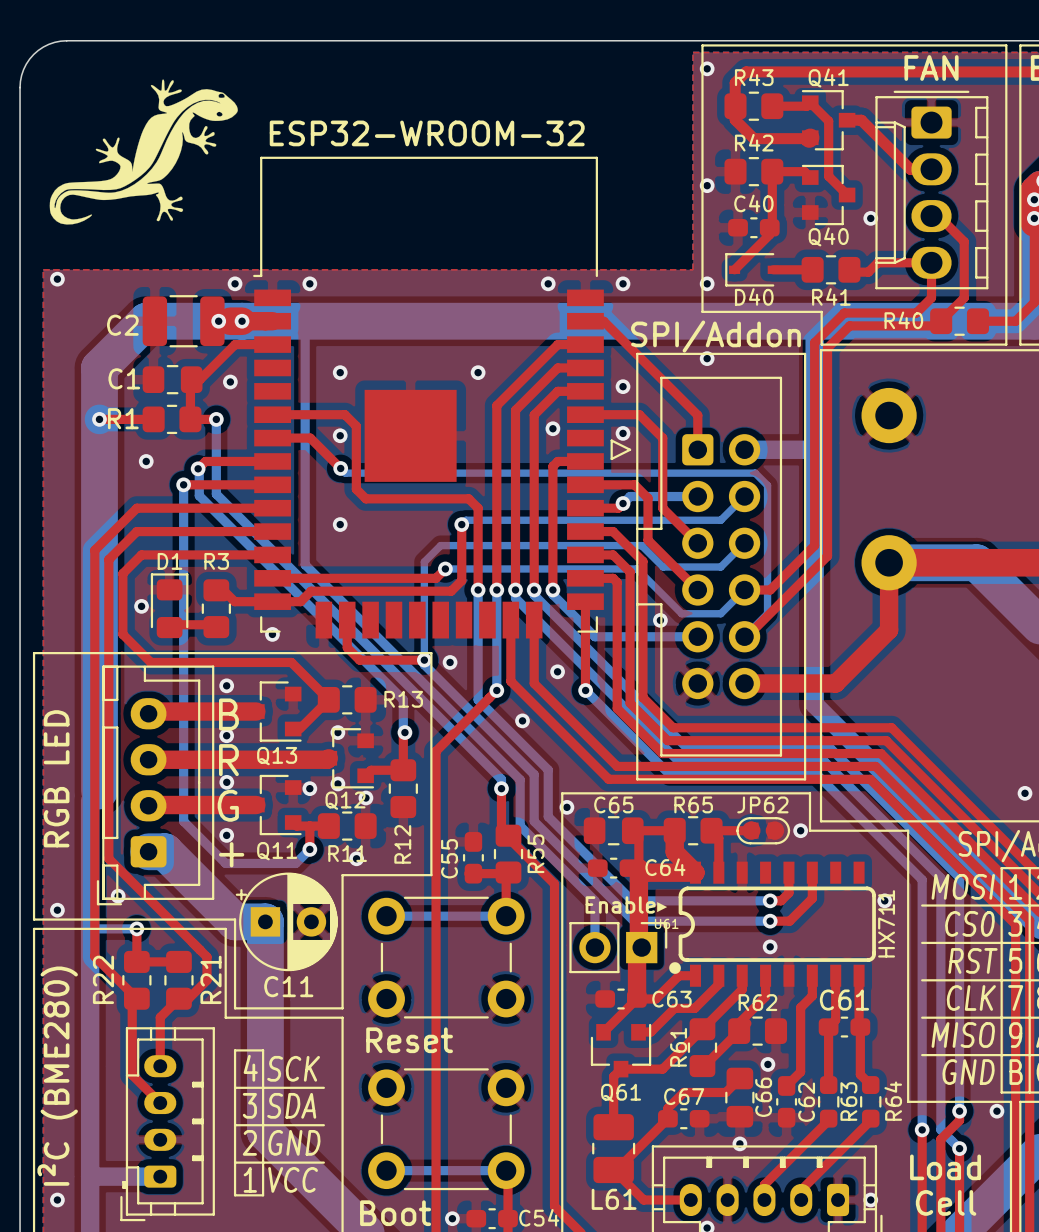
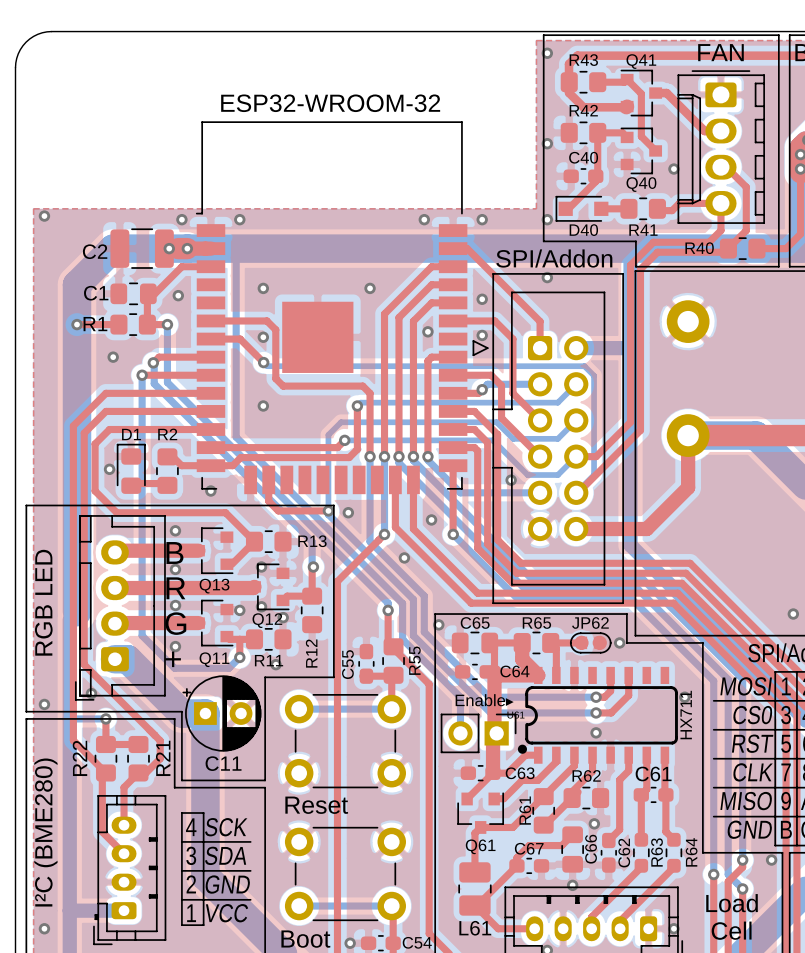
drawing: [49, 79, 238, 225] -> none
D40 footprint: [725, 253, 779, 287] -> [555, 195, 609, 222]
R3 name: R3 (216, 561) -> R2 (167, 434)

